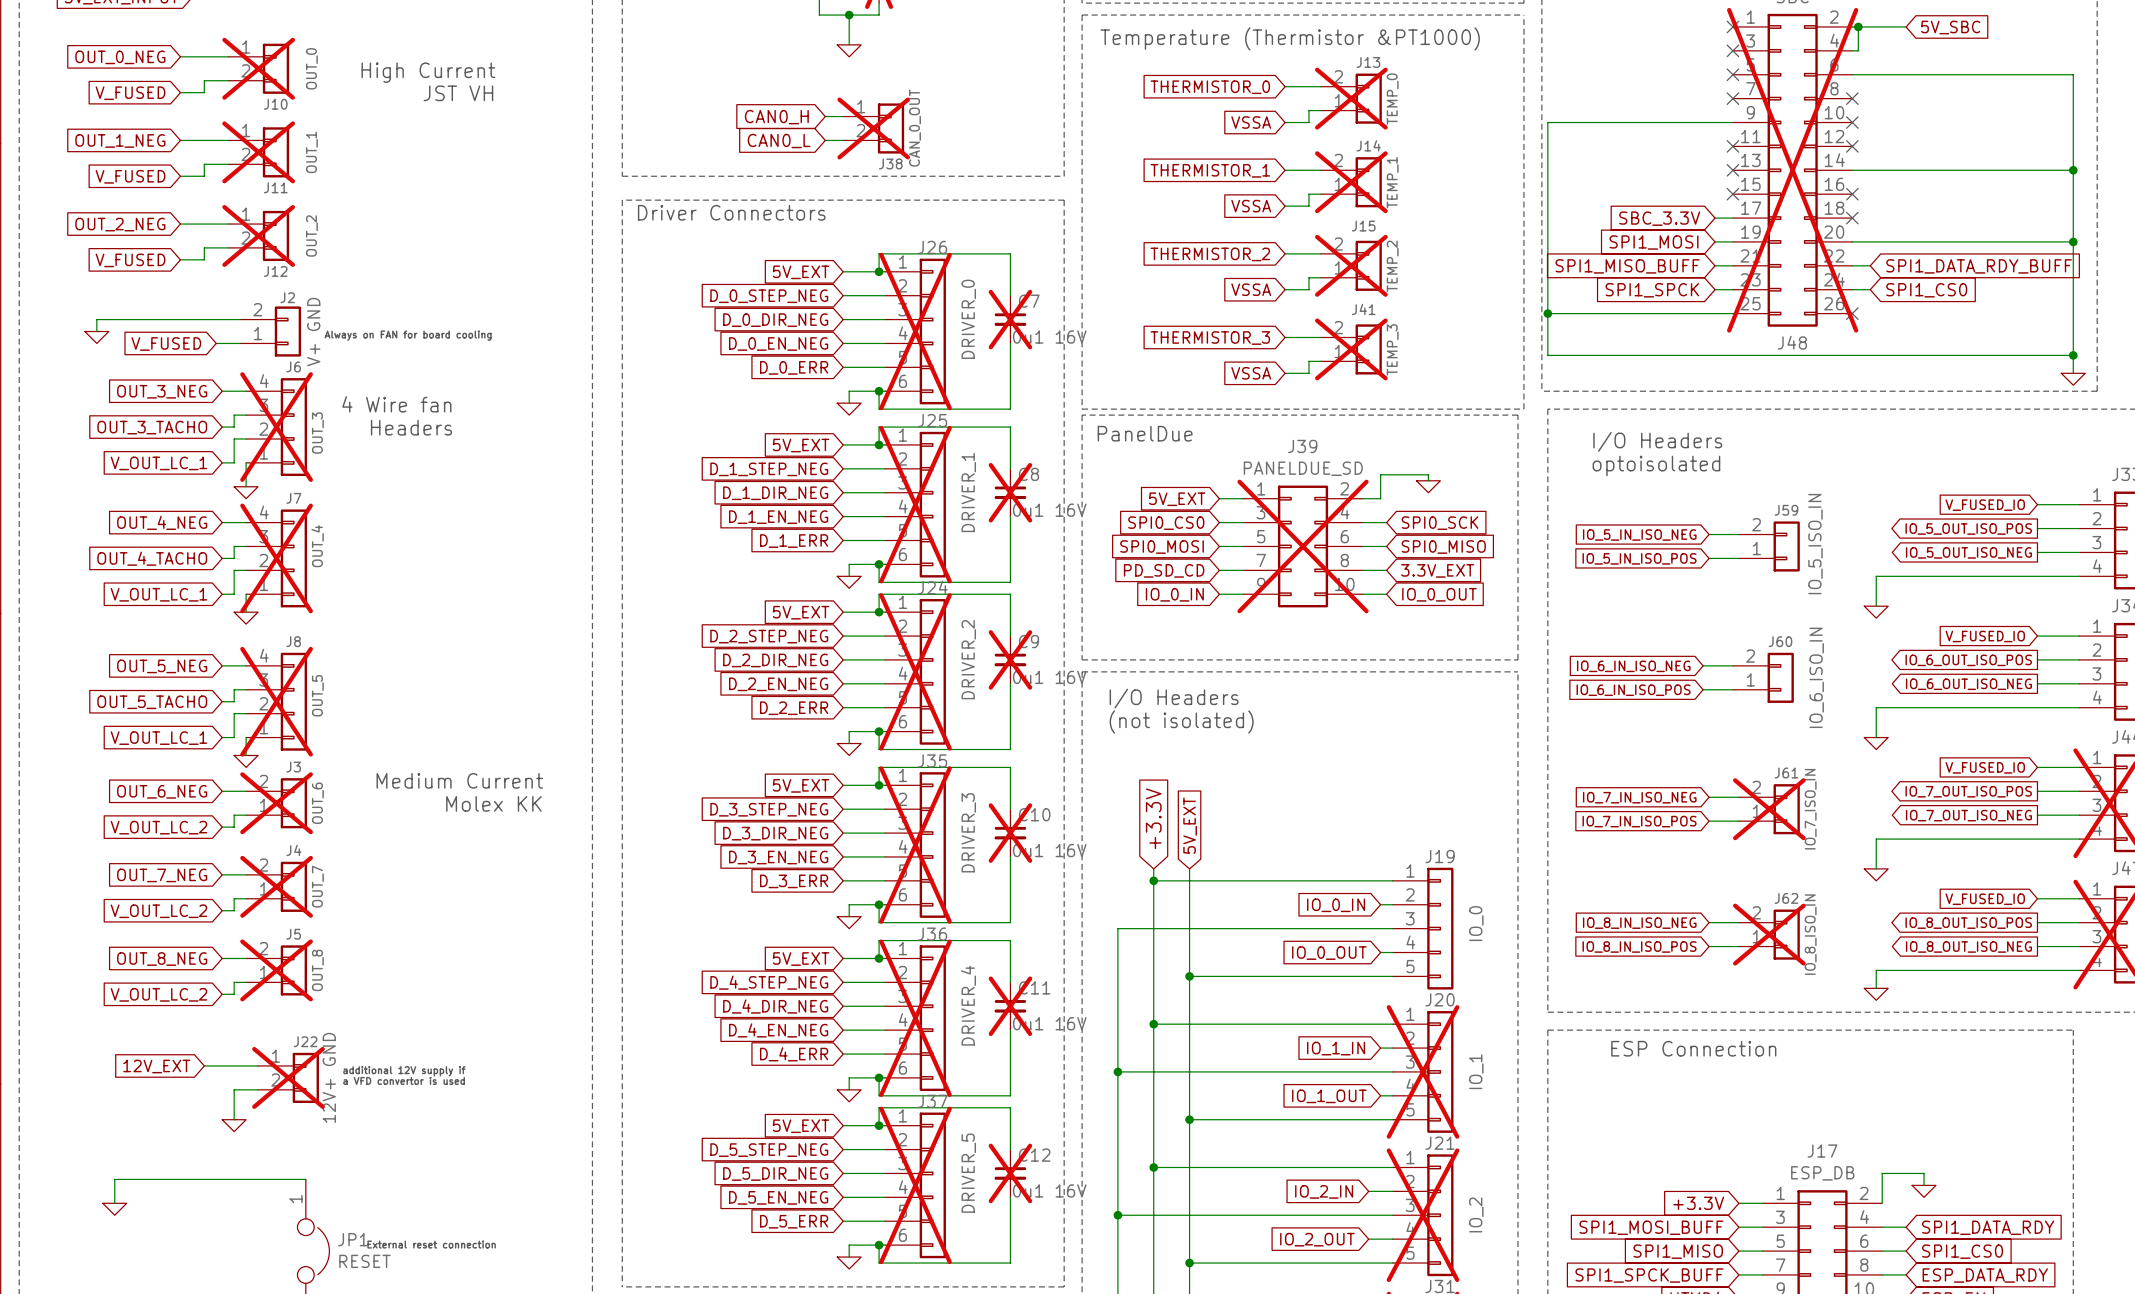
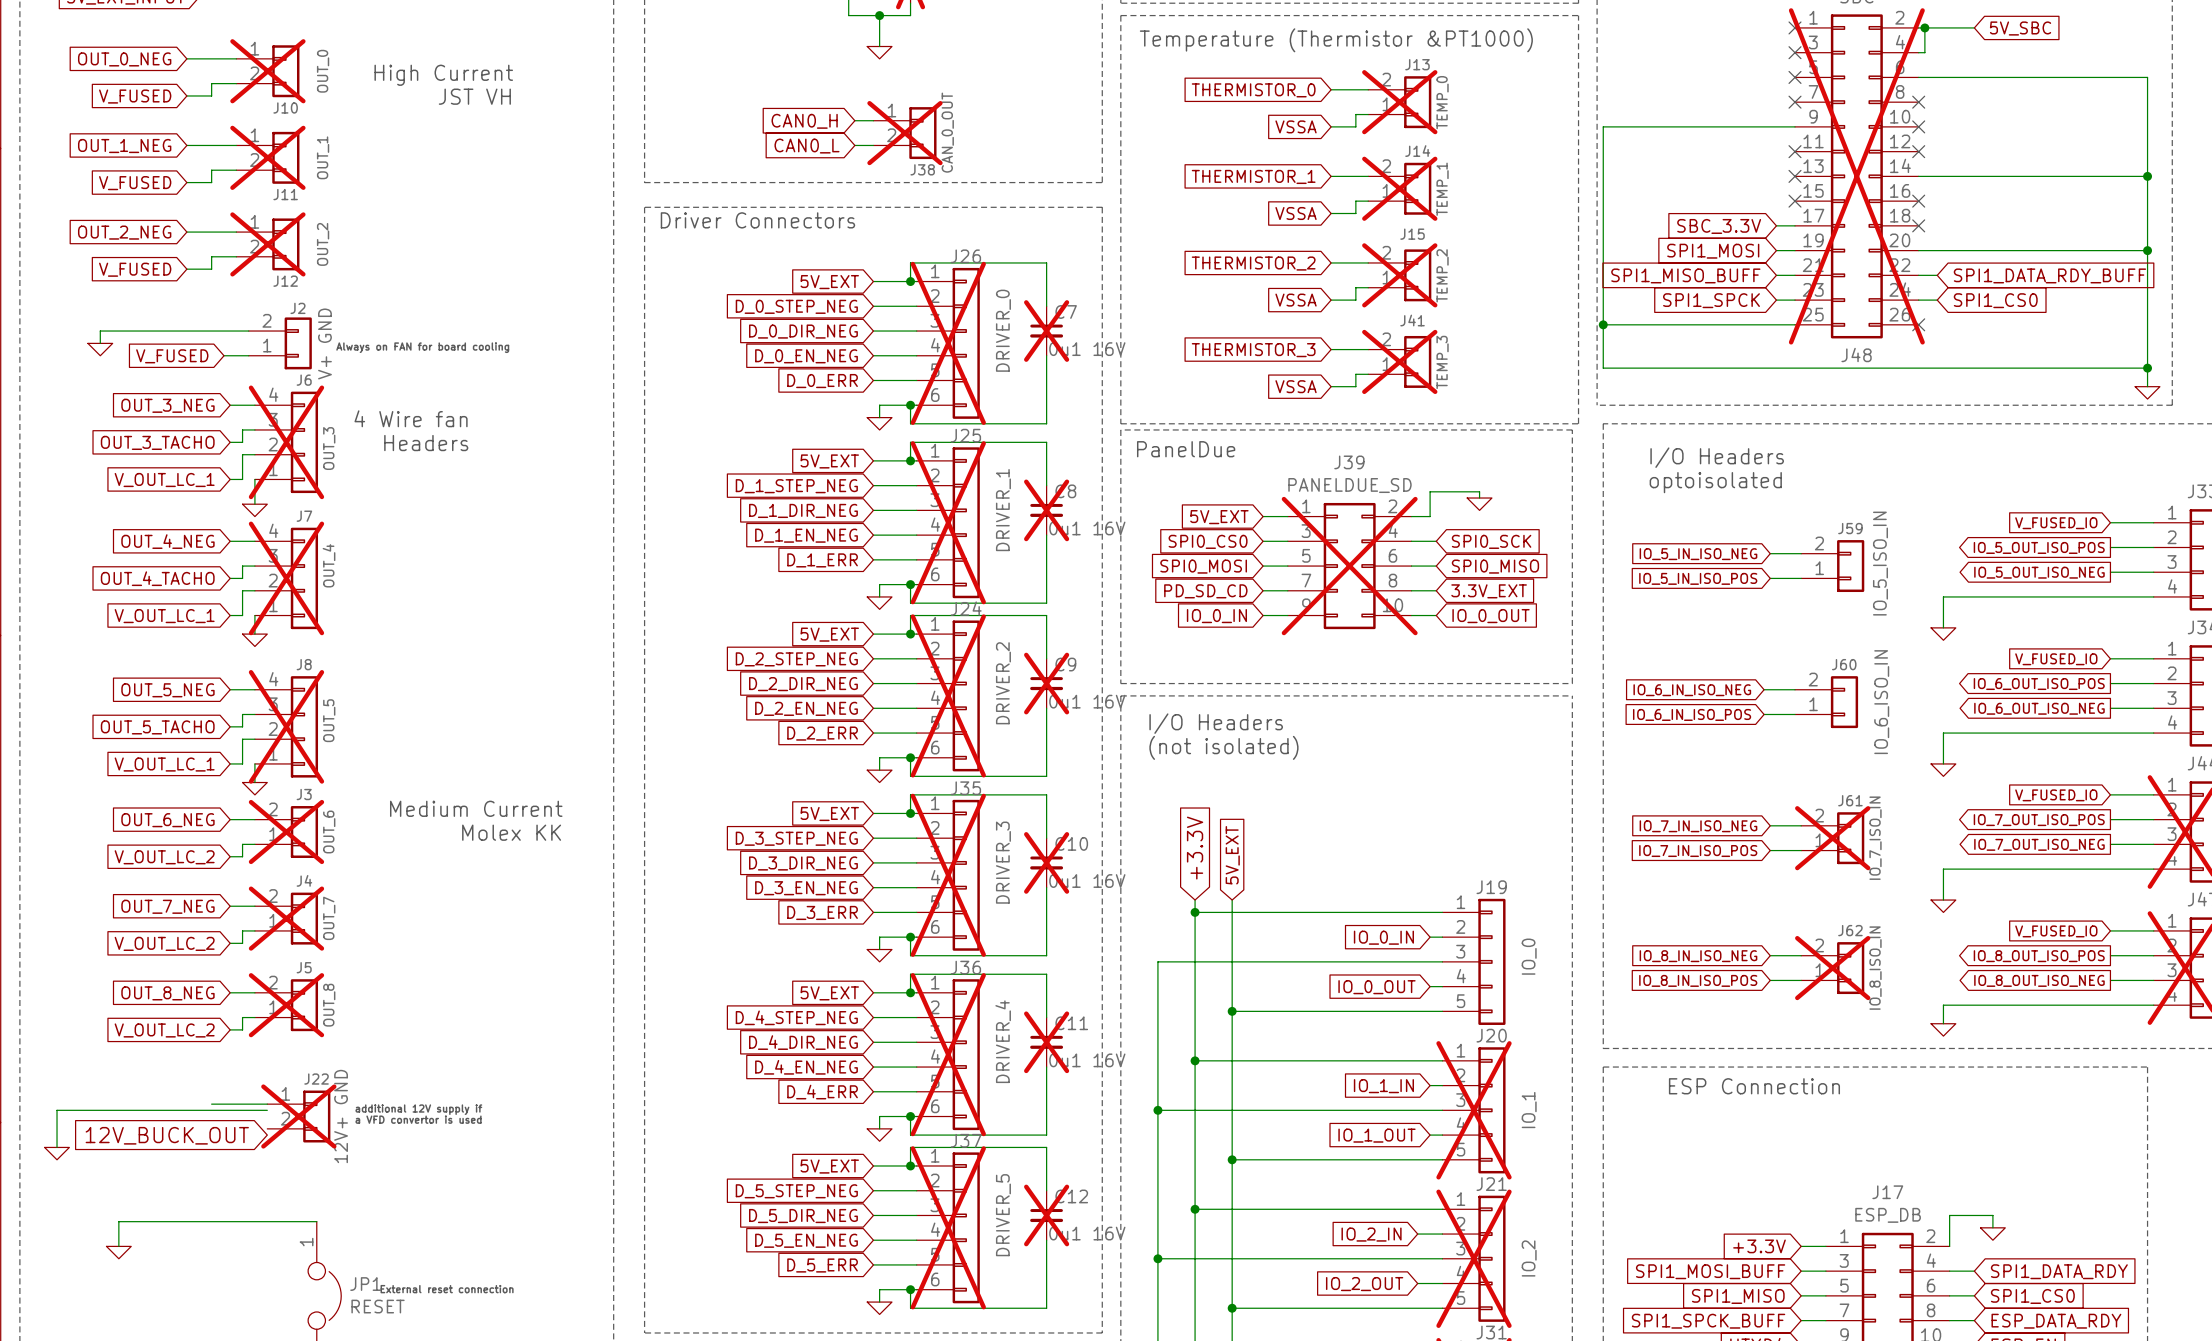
global label: 12V_EXT (156, 1066) -> none
wire: none -> (267, 1110) (57, 1110) (57, 1147)
wire: (258, 1089) (234, 1089) (234, 1119) -> none
global label: none -> 12V_BUCK_OUT (167, 1135)
power symbol position: (234, 1125) -> (57, 1153)

